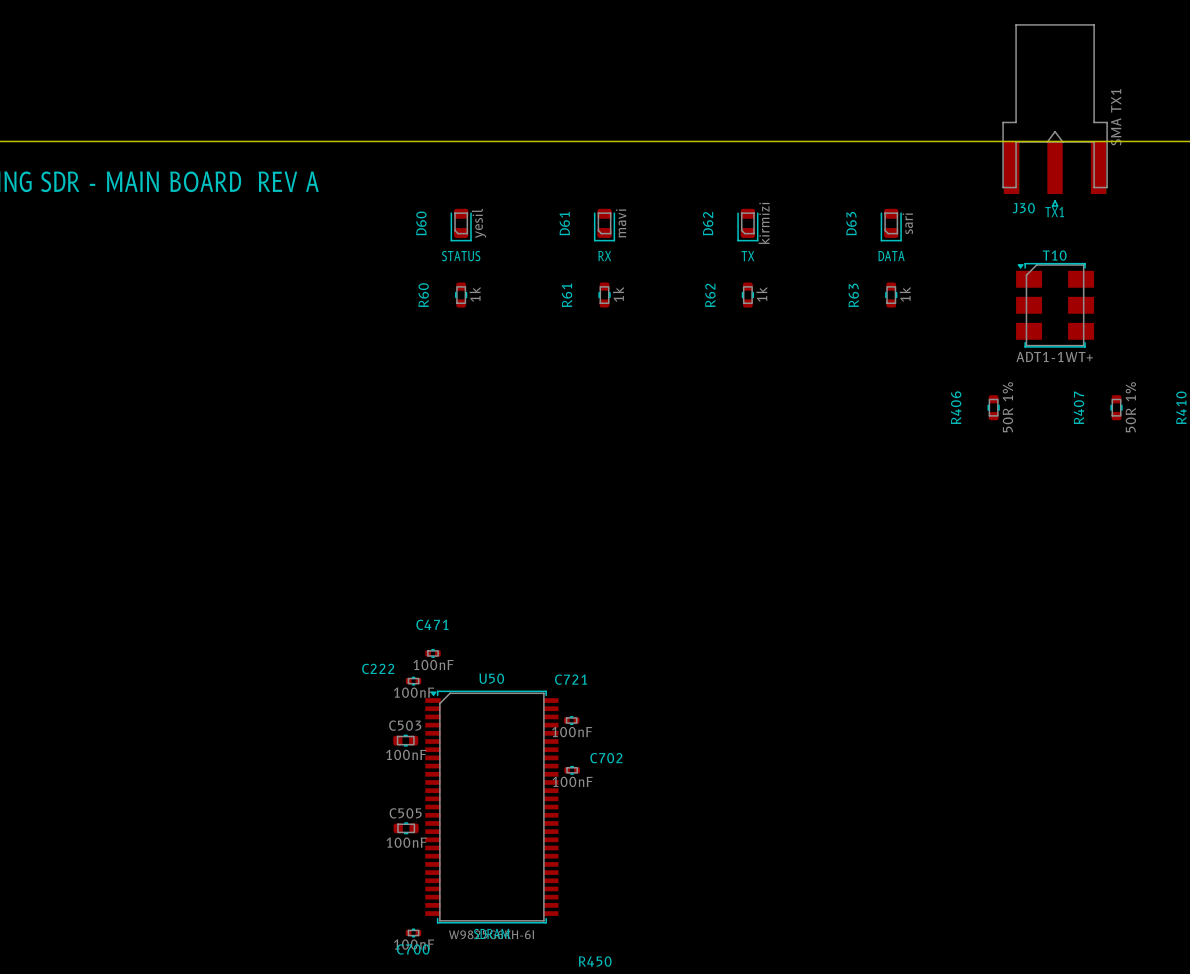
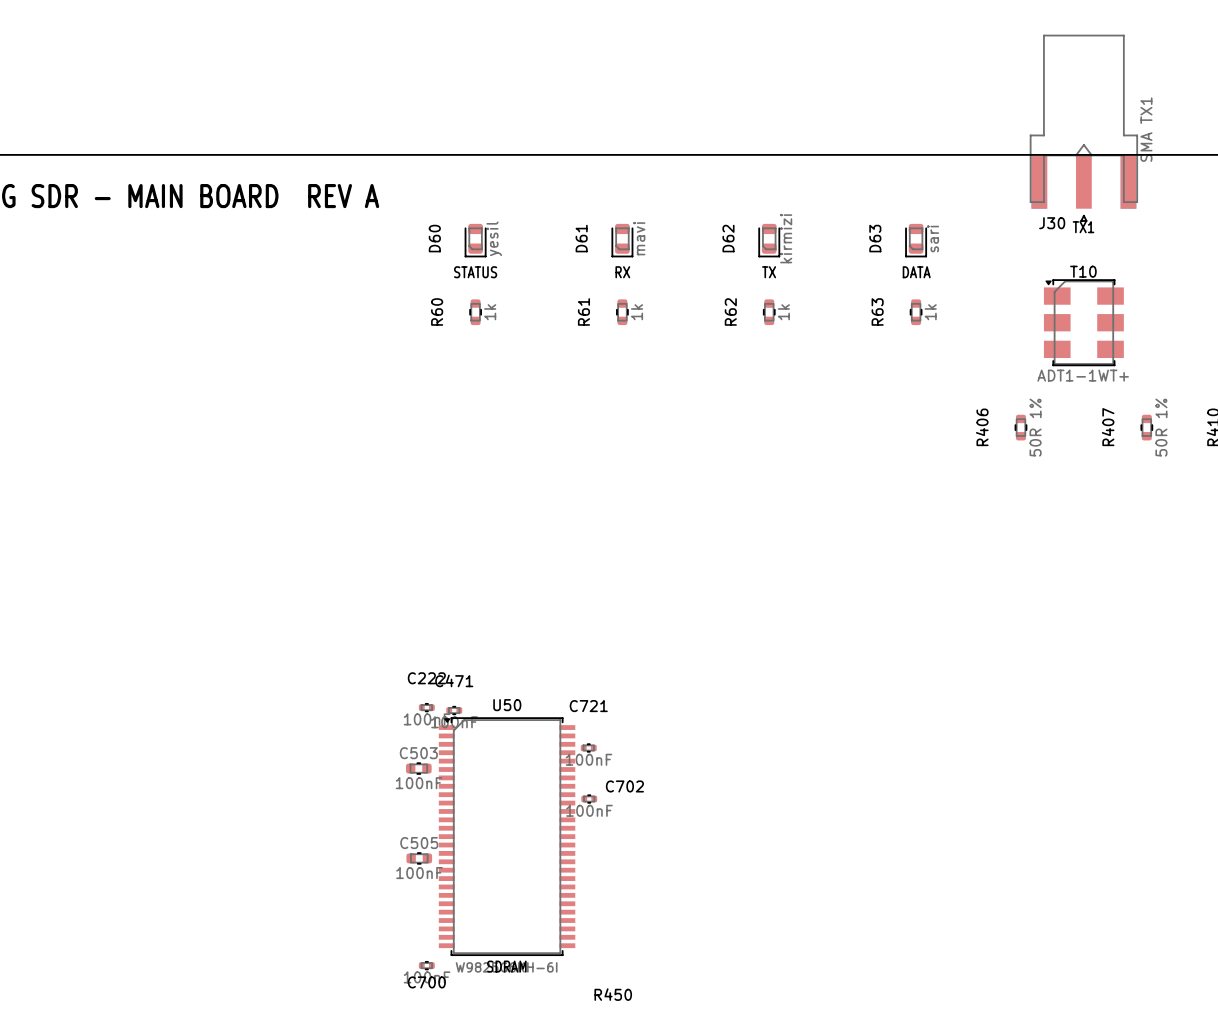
C471 position: (433, 653) -> (454, 710)
C222 name position: C222 (378, 668) -> C222 (426, 678)

